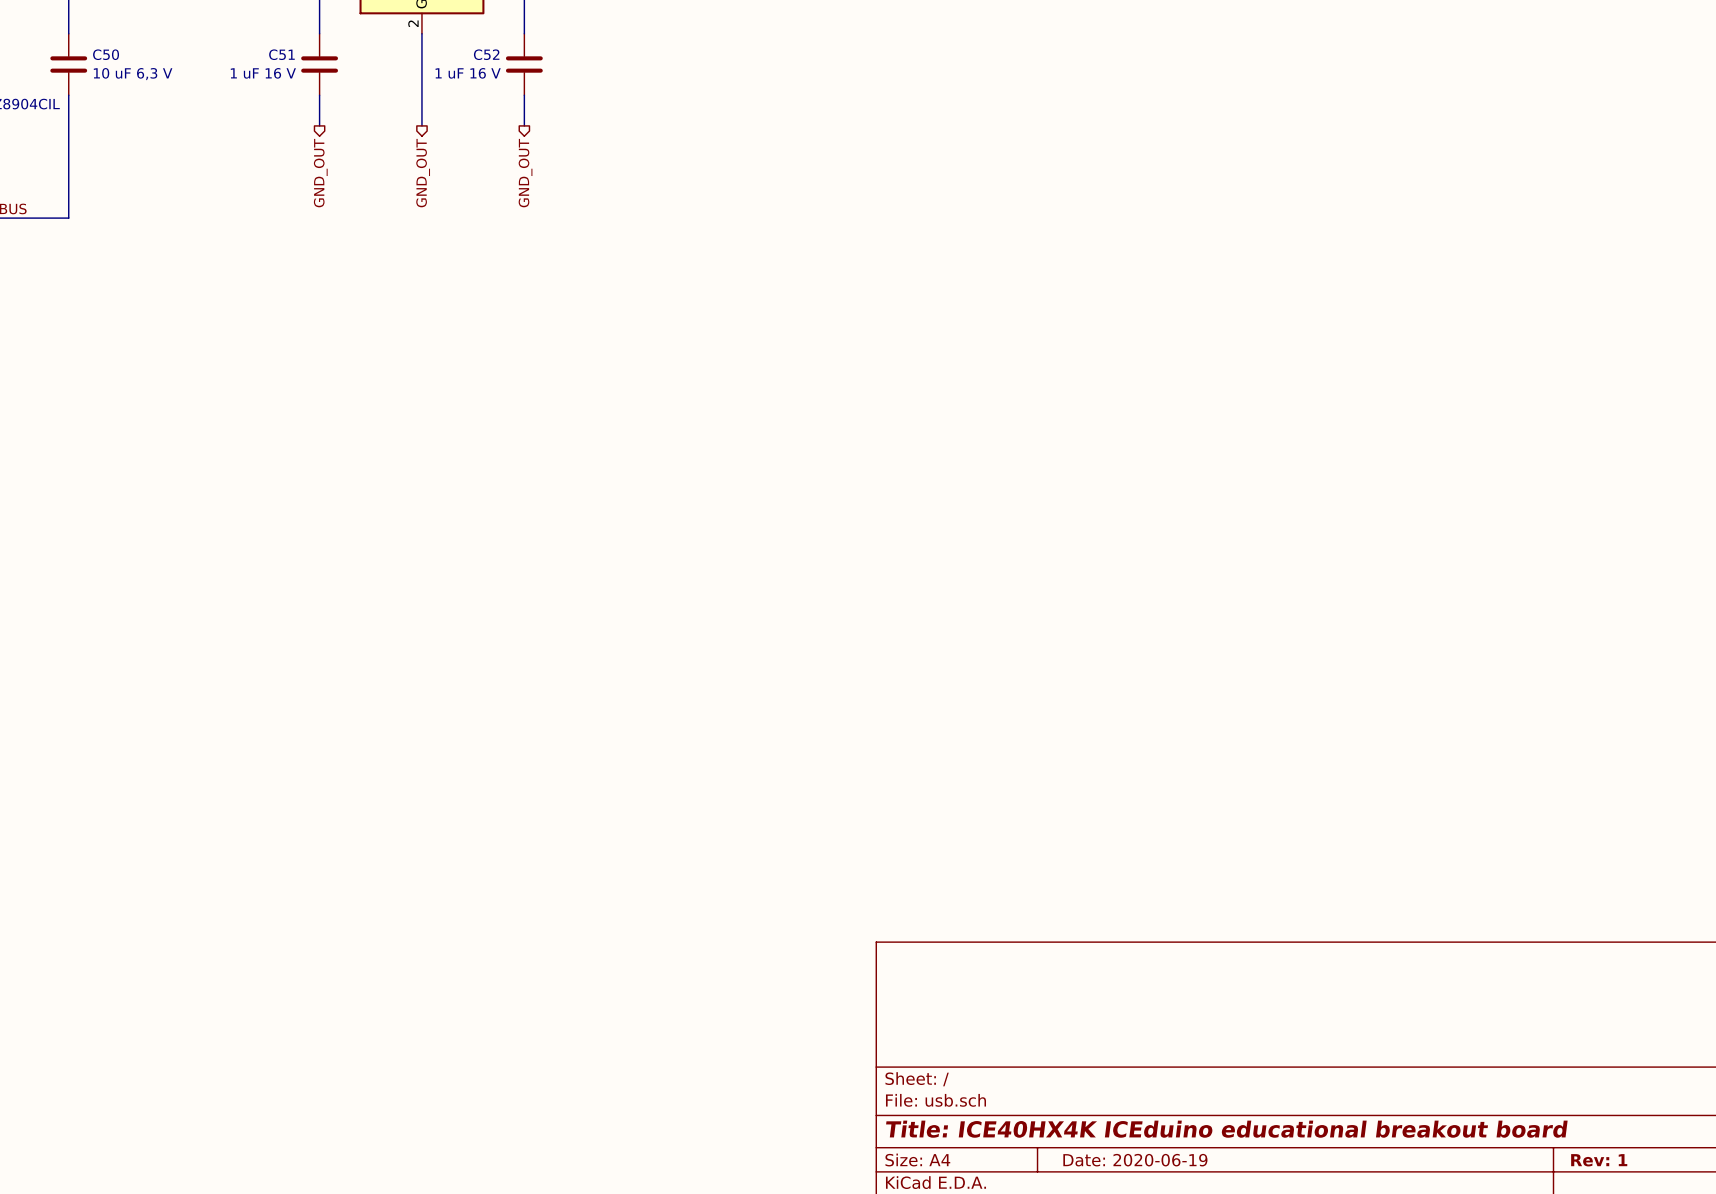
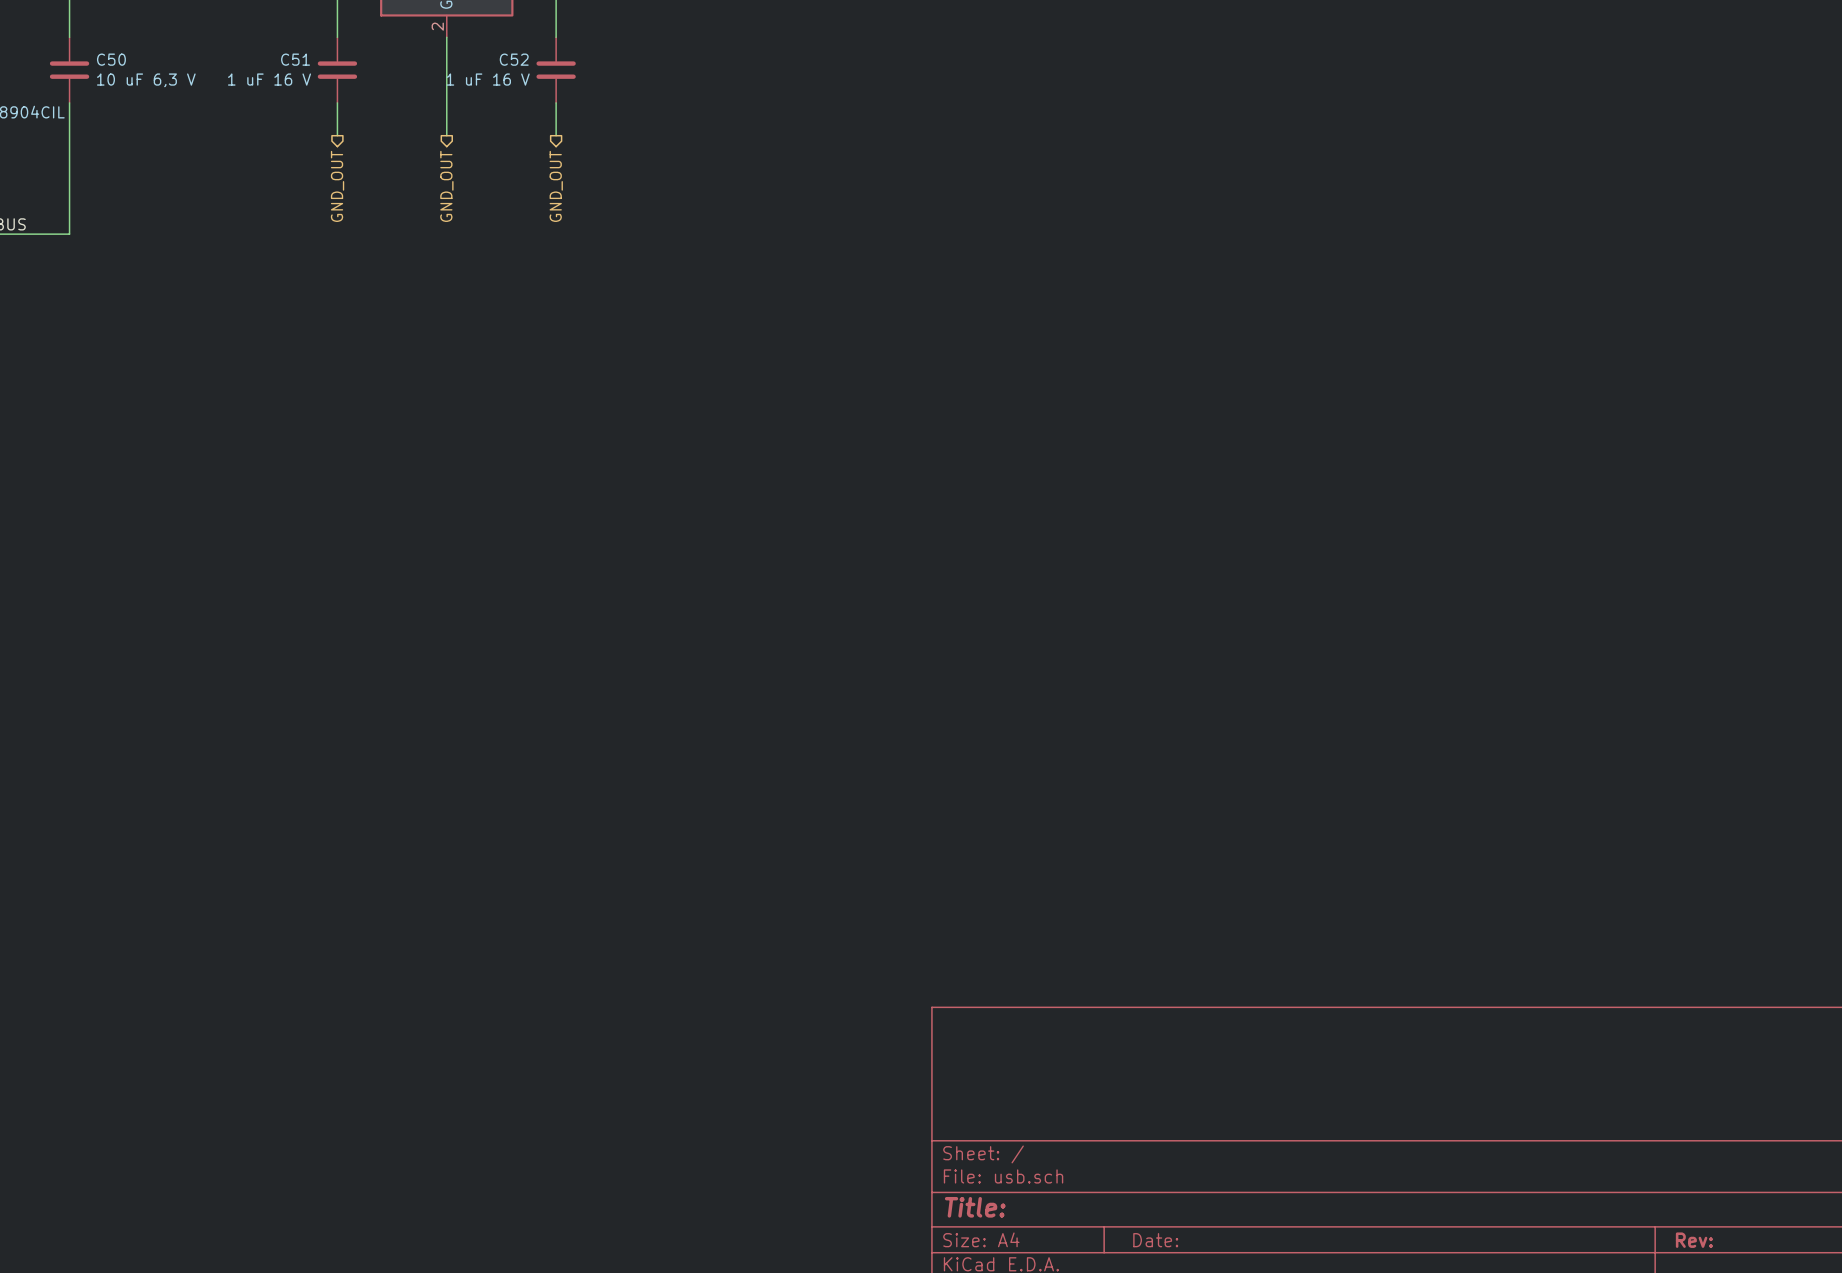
title block: Title: ICE40HX4K ICEduino educational breakout board (1226, 1129) -> Title: (975, 1207)
title block: Date: 2020-06-19 (1135, 1160) -> Date: (1155, 1240)
title block: Rev: 1 (1599, 1160) -> Rev: (1694, 1240)

